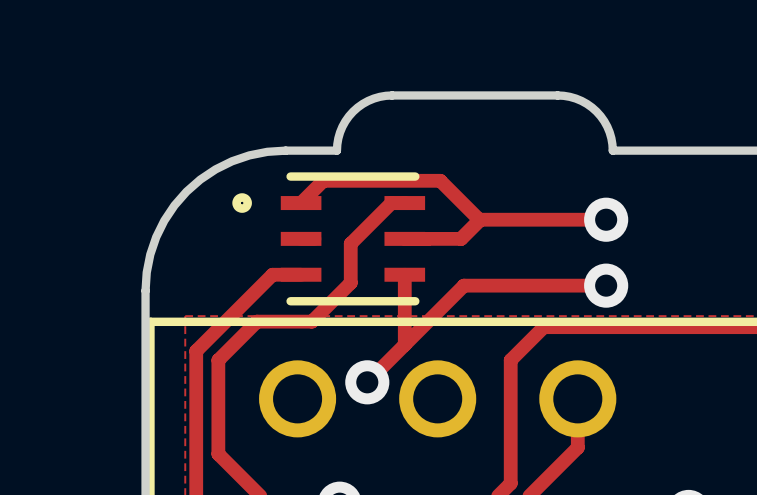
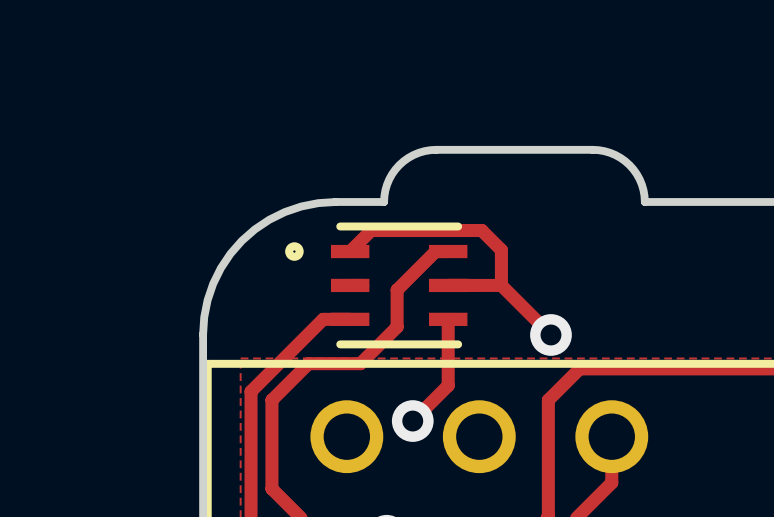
track: (440, 180) (479, 220) -> (481, 230) (501, 250) (501, 285) (550, 334)
track: (606, 219) (480, 219) (461, 238) -> none
via: (606, 219) -> none
track: (606, 285) (463, 285) (404, 344) -> none
via: (606, 285) -> none
via: none -> (550, 334)

